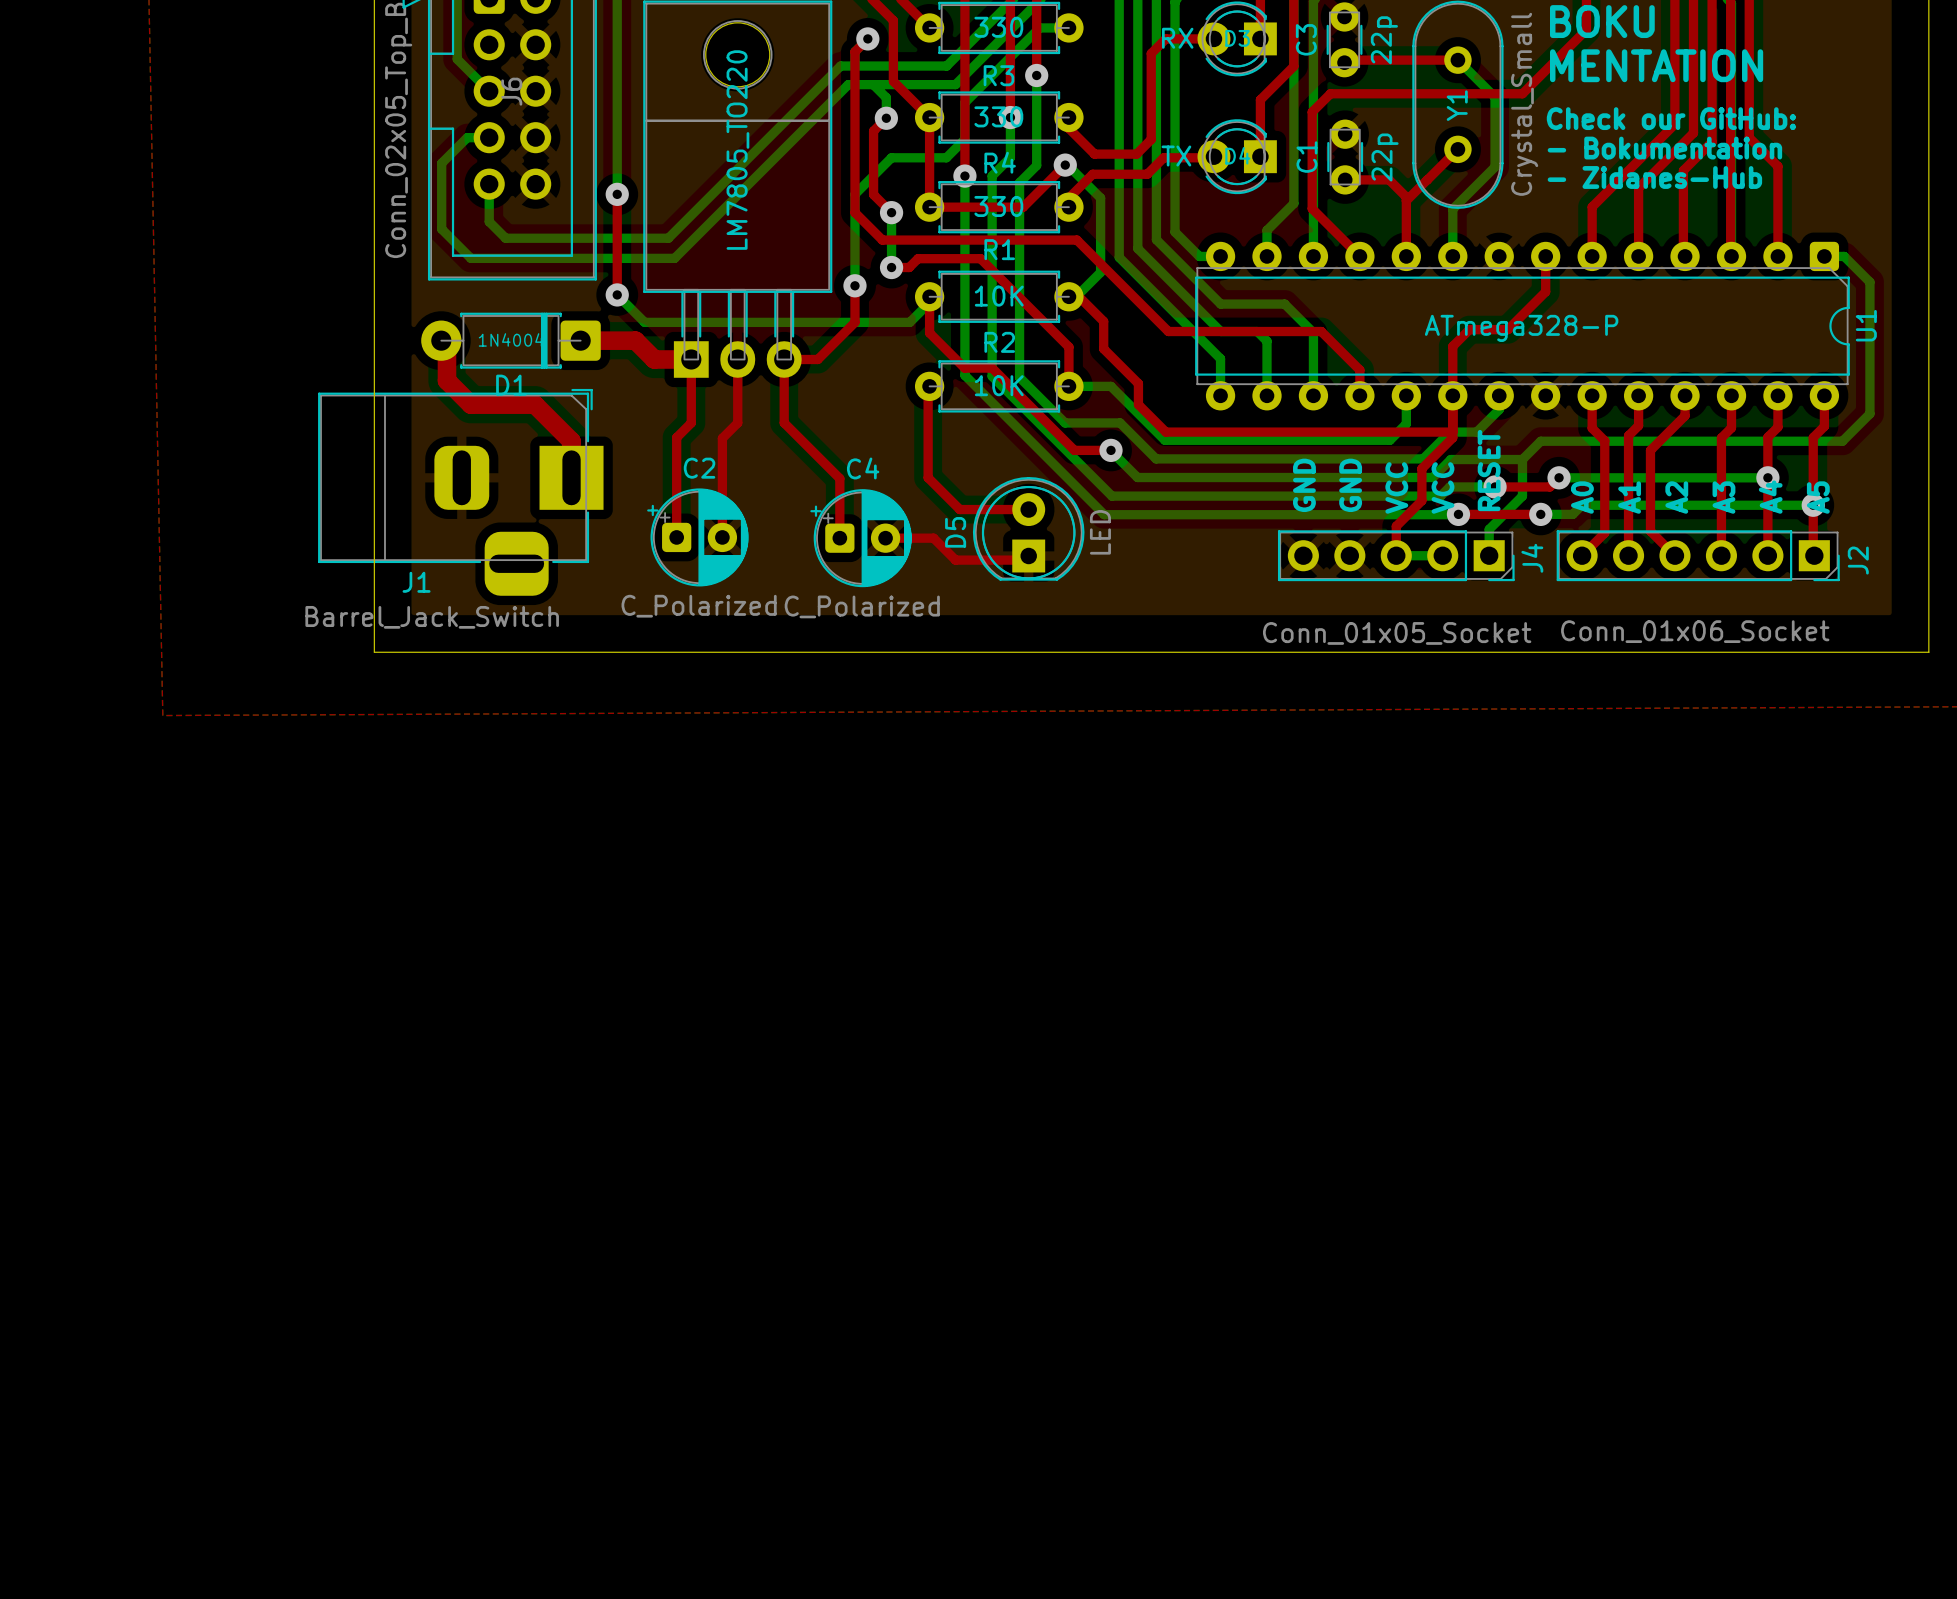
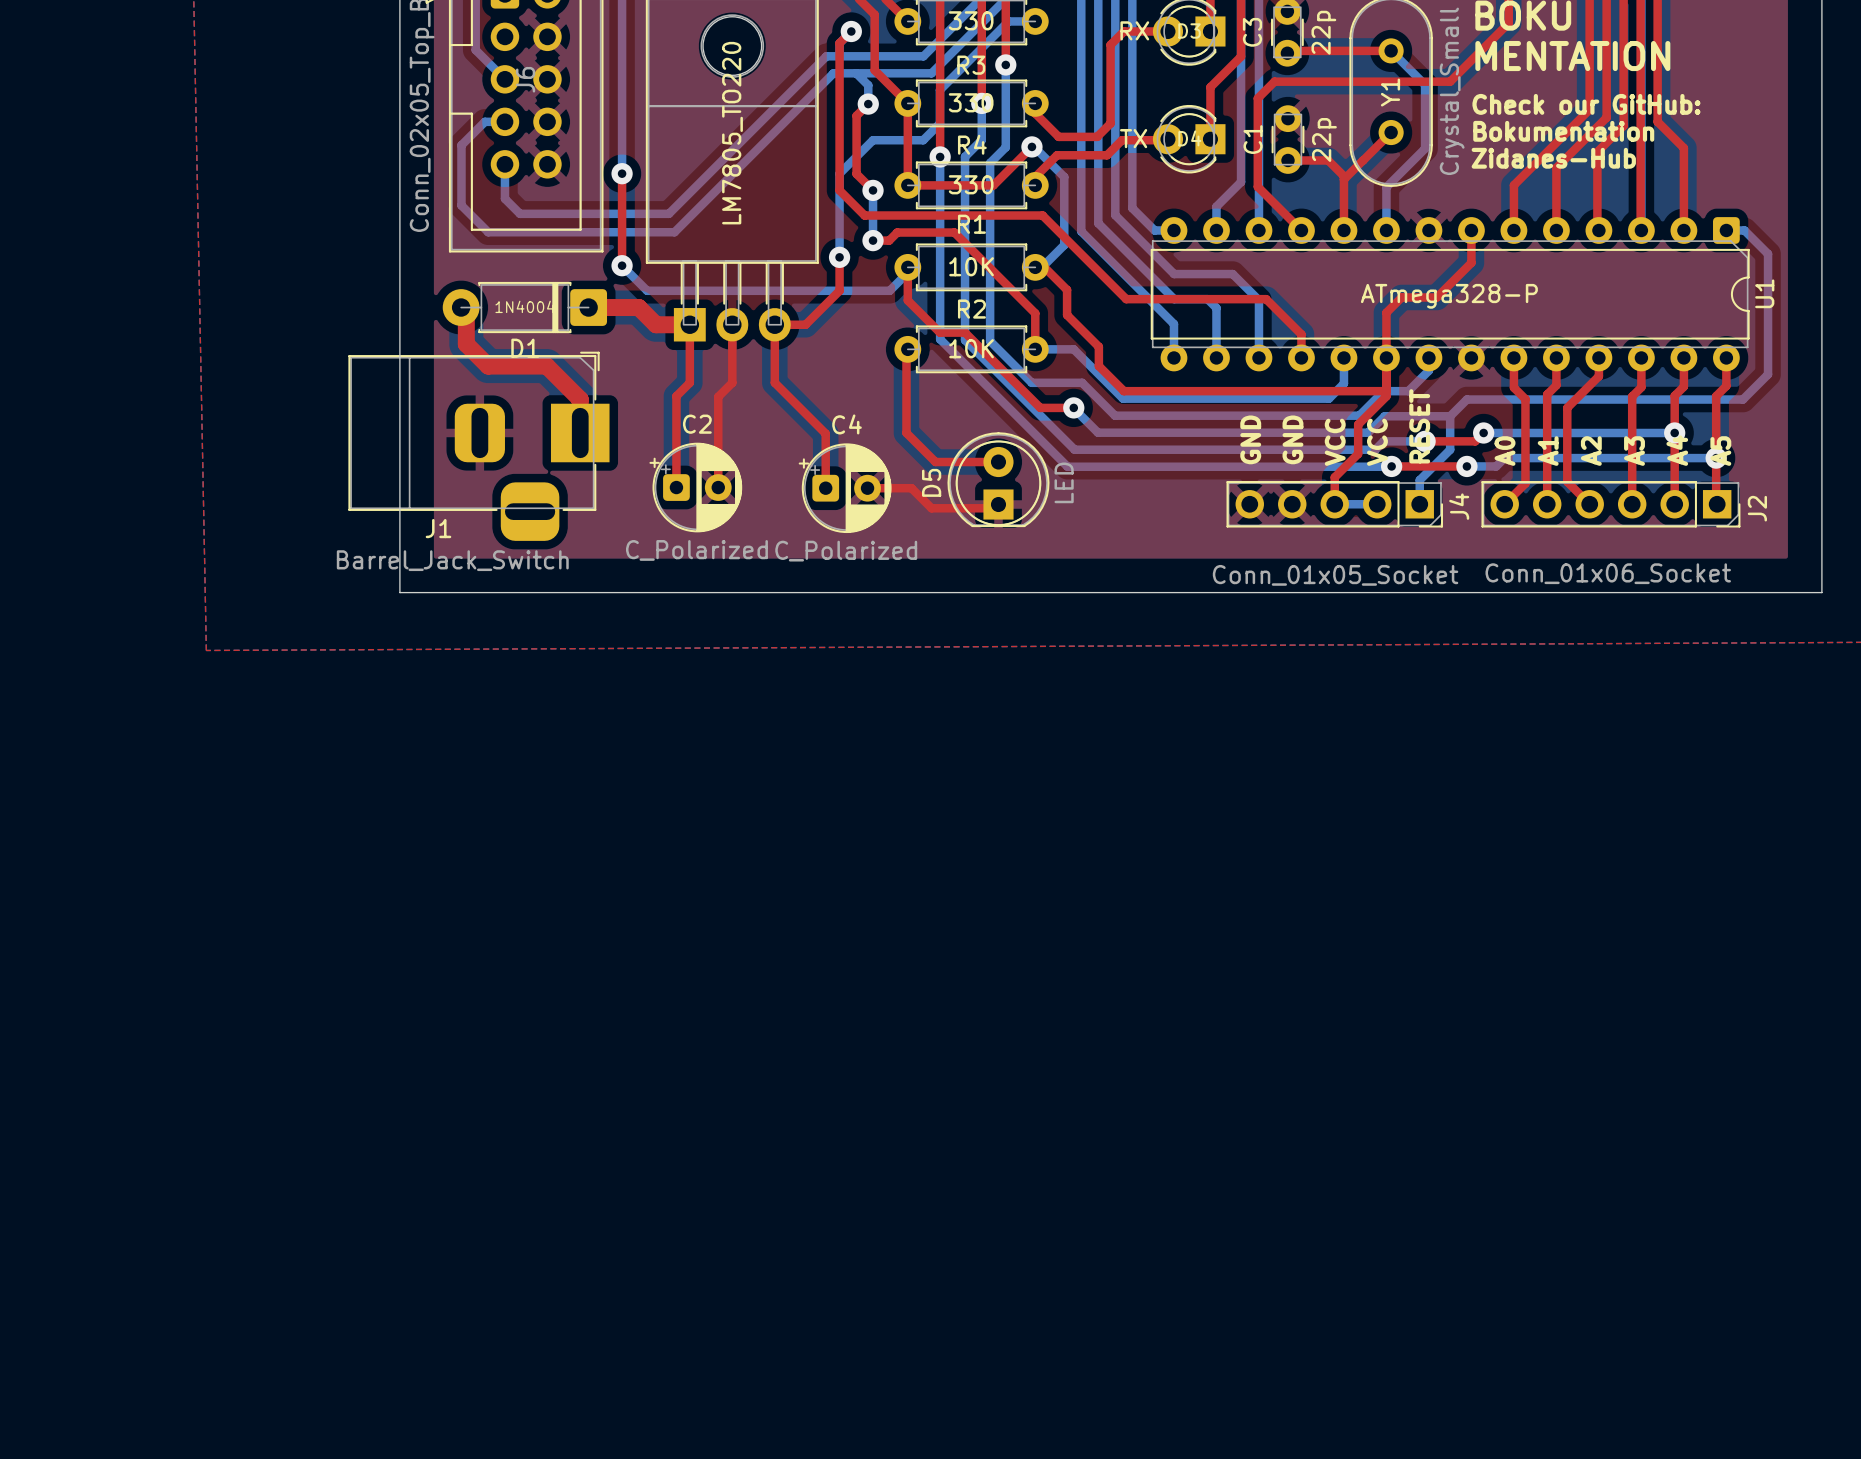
text: - Bokumentation (1664, 148) -> Bokumentation (1563, 131)
text: - Zidanes-Hub (1654, 177) -> Zidanes-Hub (1553, 158)

